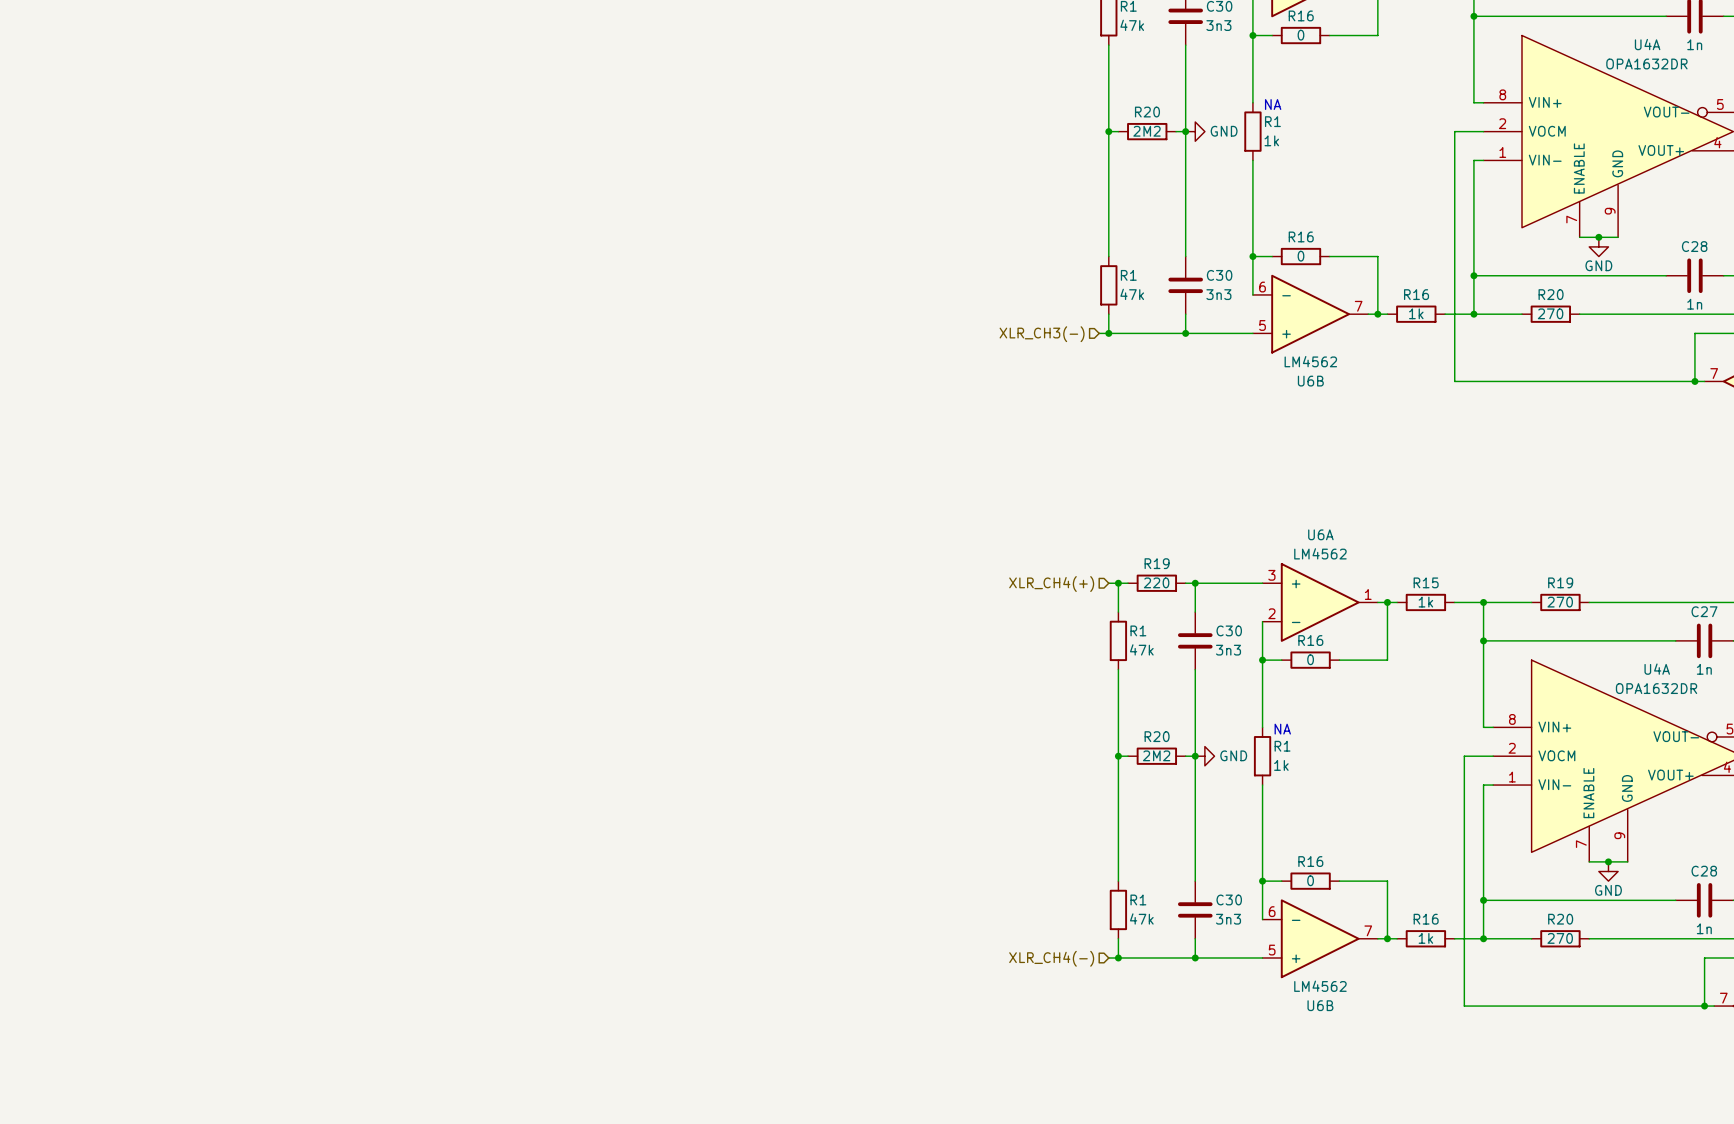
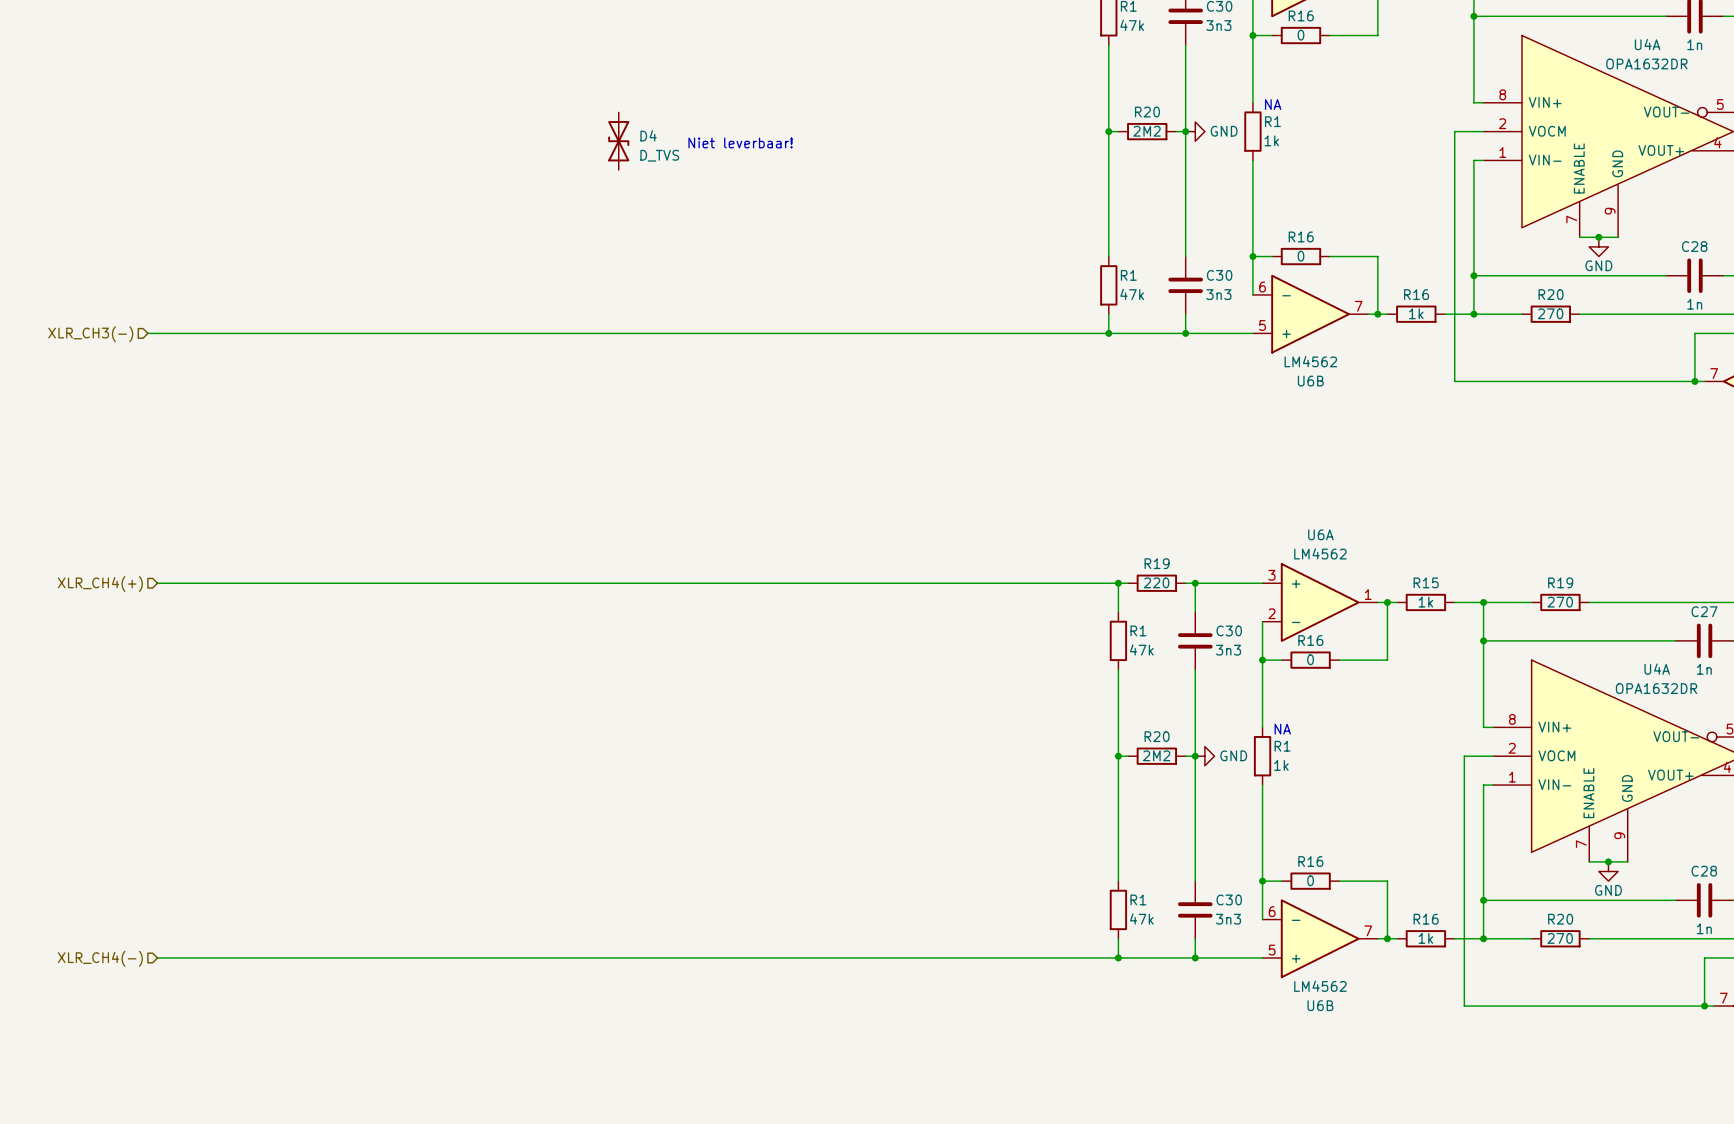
D4: none -> D_TVS (618, 141)
text: none -> Niet leverbaar! (740, 142)
wire: none -> (147, 333) (1099, 333)
hierarchical label: none -> XLR_CH3(-) (90, 334)
hierarchical label: XLR_CH3(-) (1042, 334) -> none
wire: none -> (157, 583) (1108, 583)
hierarchical label: none -> XLR_CH4(+) (100, 584)
hierarchical label: XLR_CH4(+) (1051, 584) -> none
wire: none -> (157, 957) (1108, 957)
hierarchical label: none -> XLR_CH4(-) (100, 958)
hierarchical label: XLR_CH4(-) (1051, 958) -> none

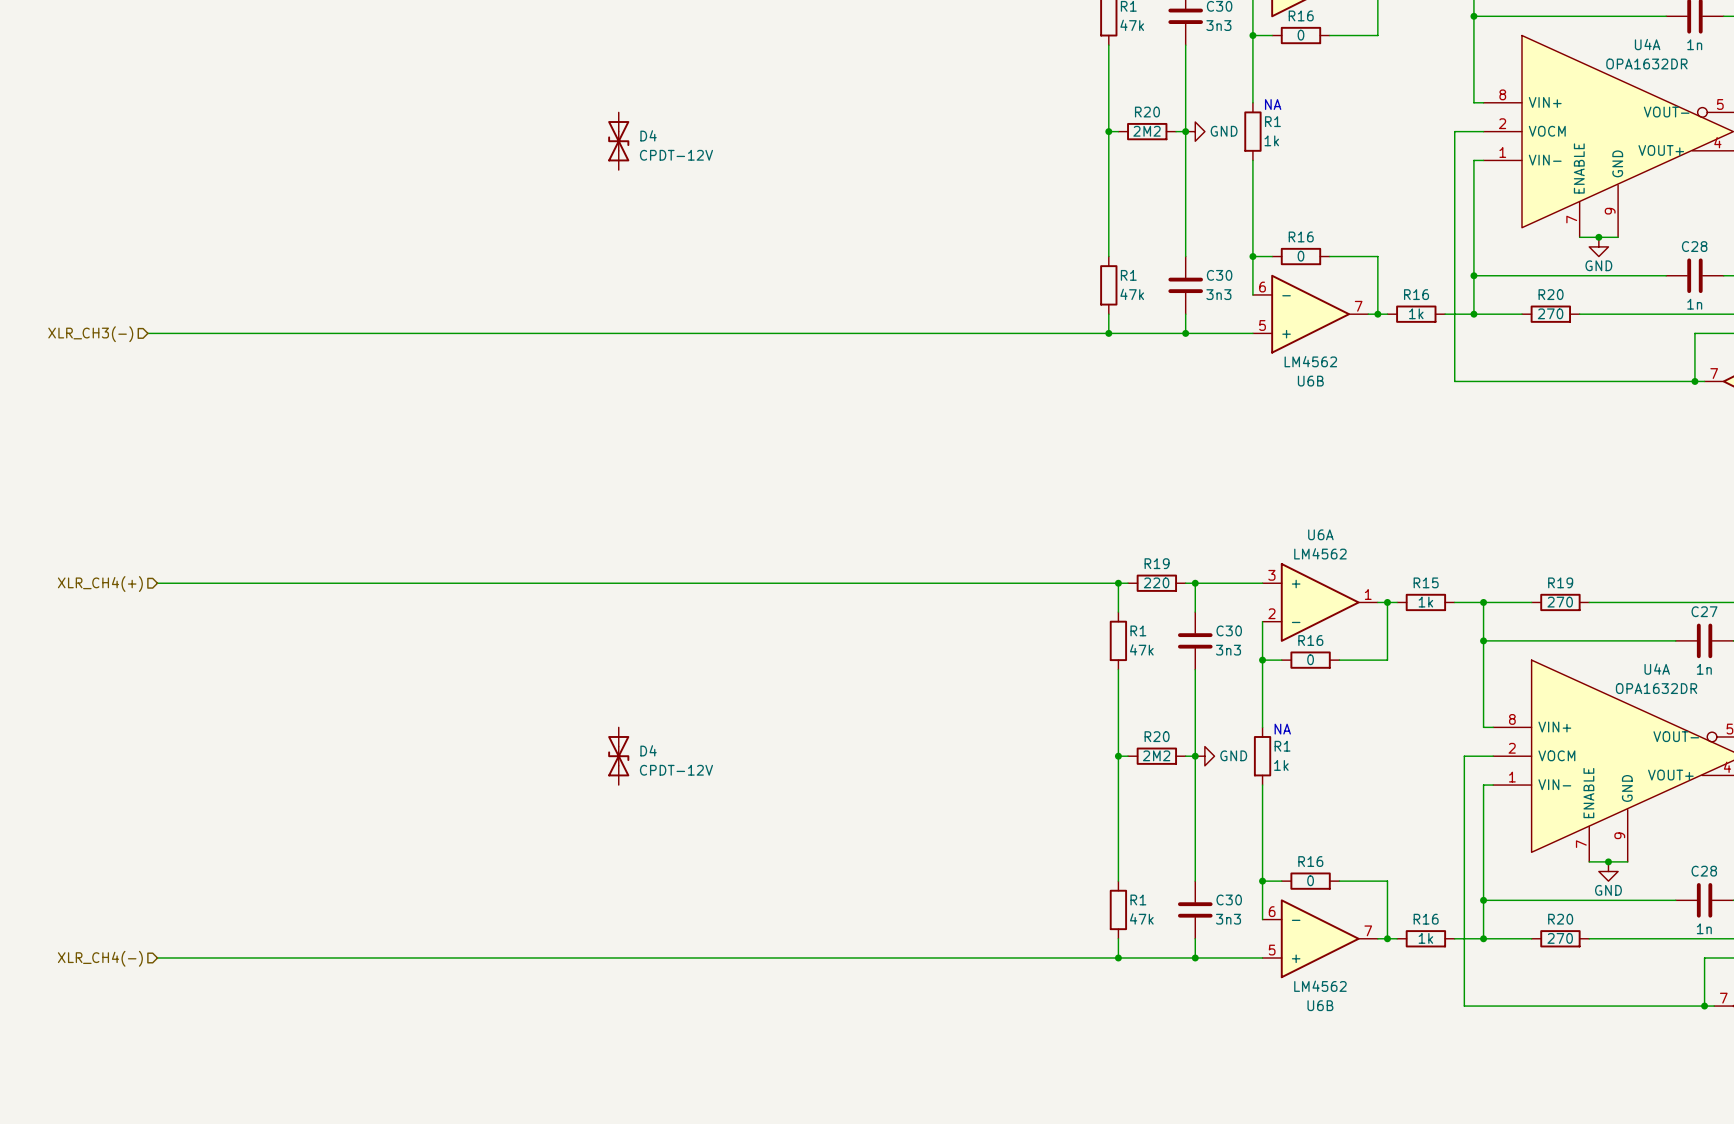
text: Niet leverbaar! (740, 142) -> none
D4 value: D_TVS (659, 155) -> CPDT-12V (676, 155)
D4: none -> CPDT-12V (618, 756)

